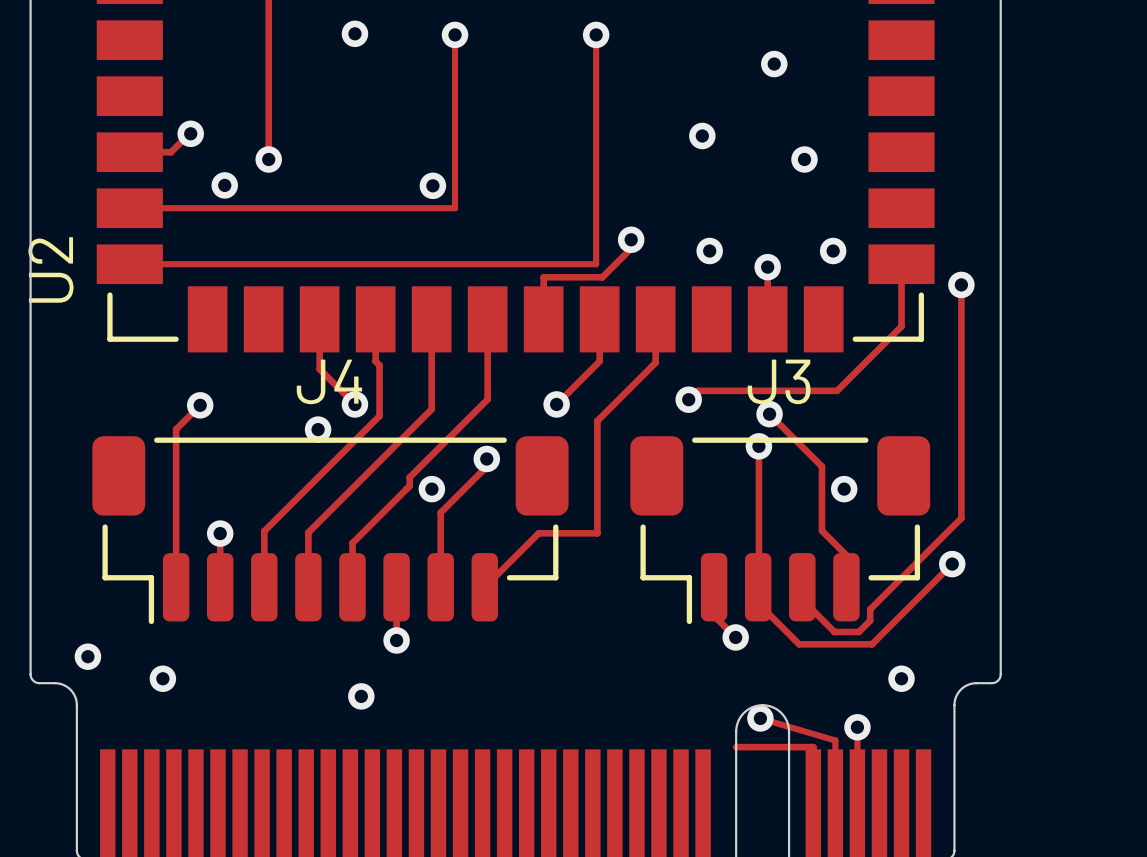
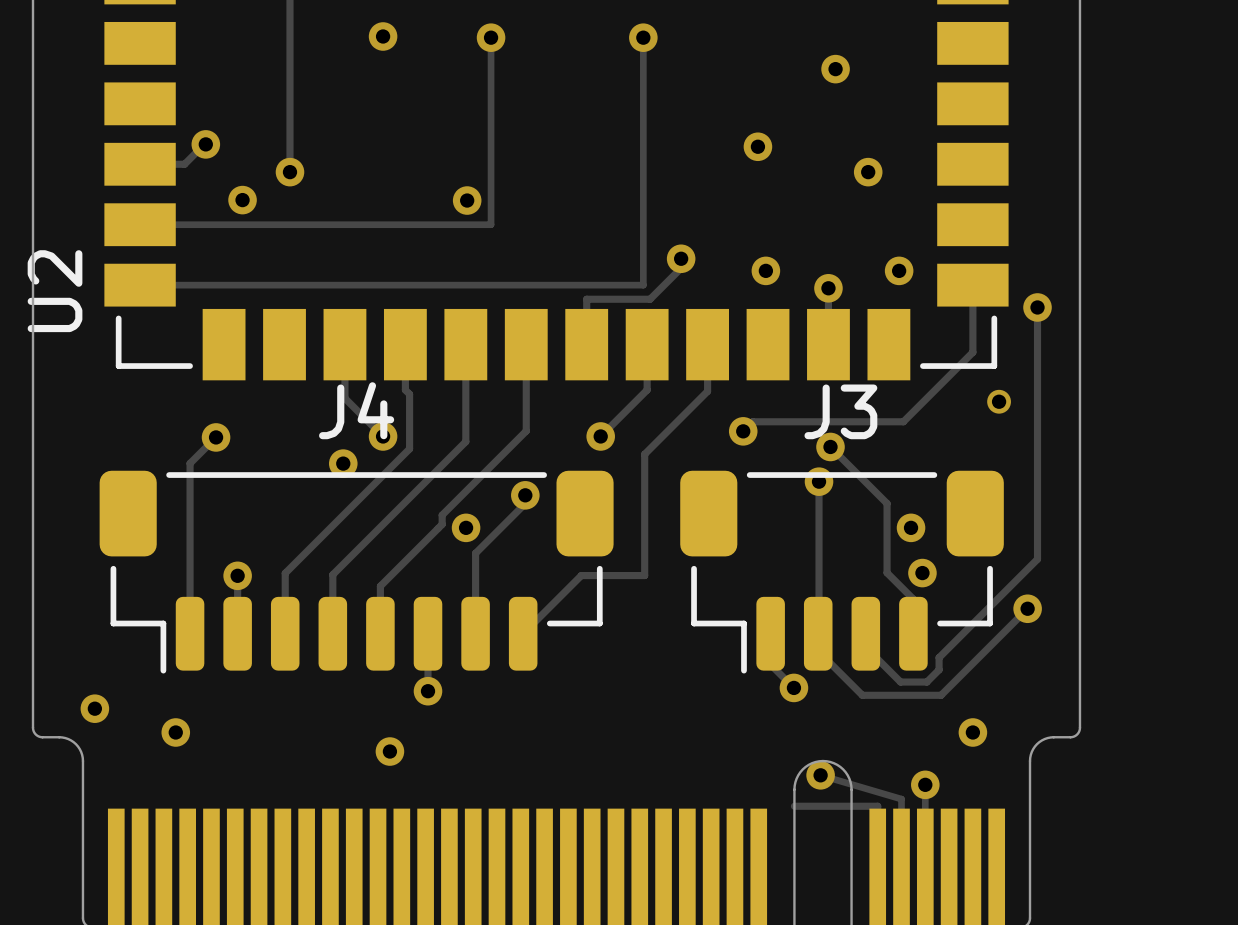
via: none -> (999, 401)
via: none -> (922, 573)

